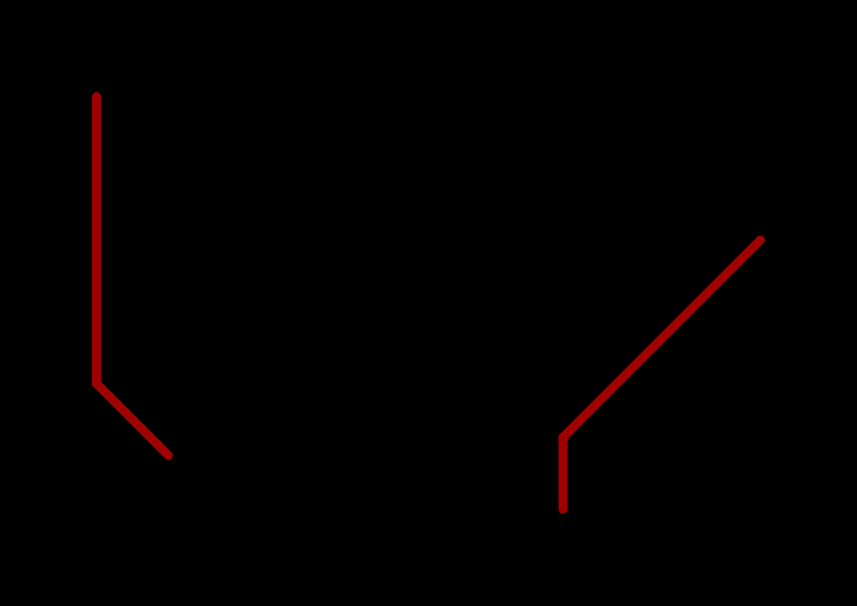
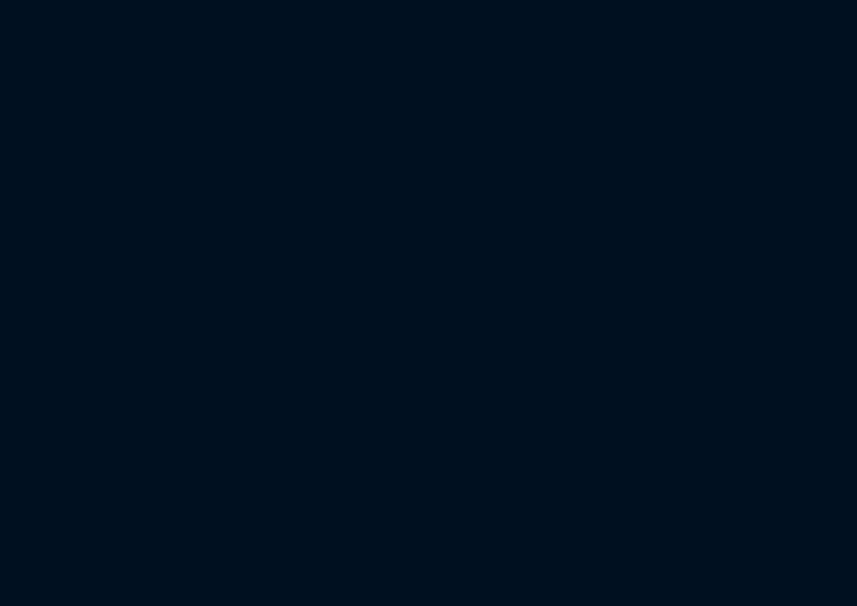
track: (96, 96) (96, 383) (168, 455) -> none
track: (760, 240) (563, 437) (563, 509) -> none

